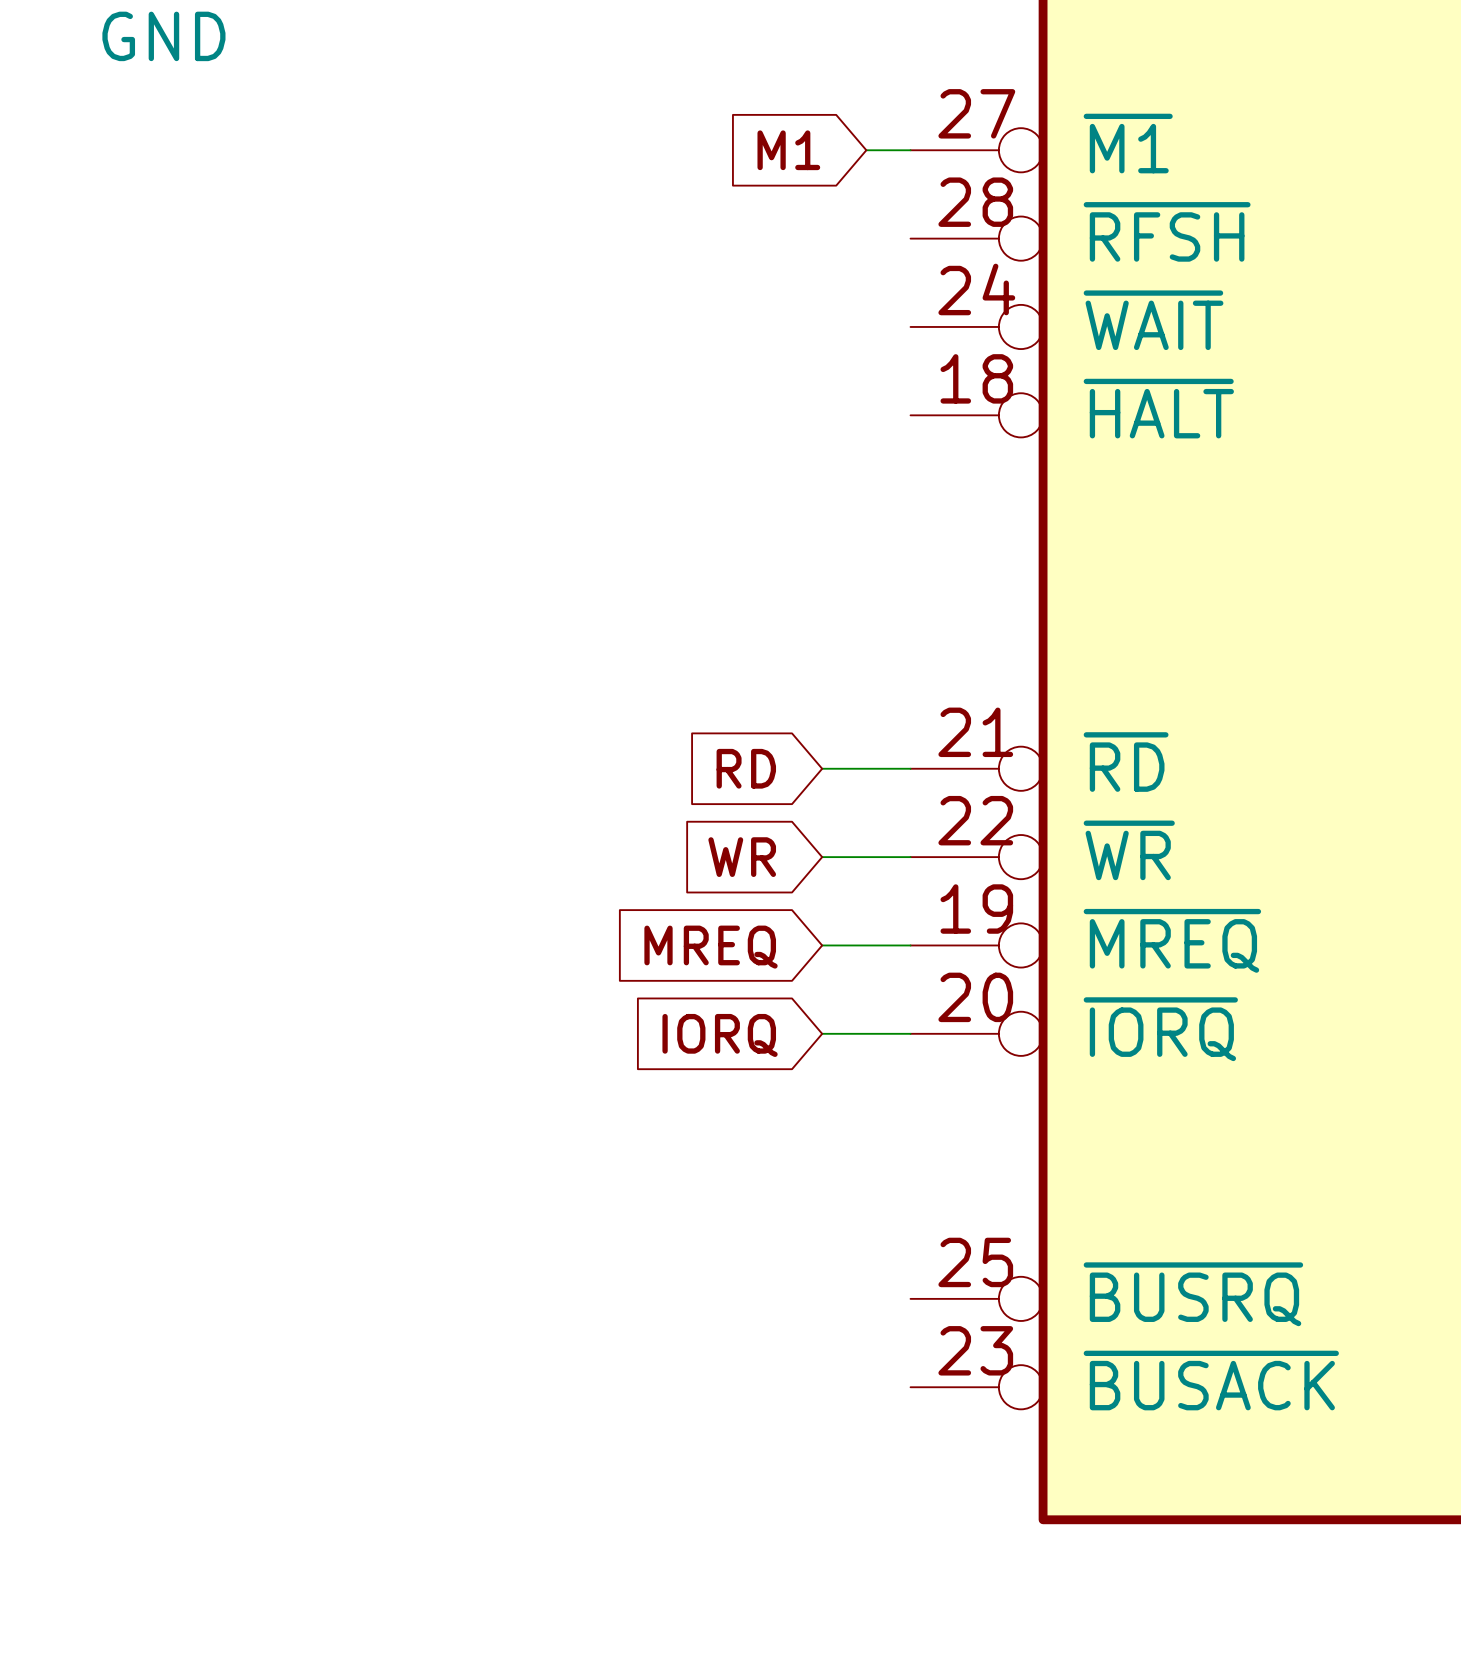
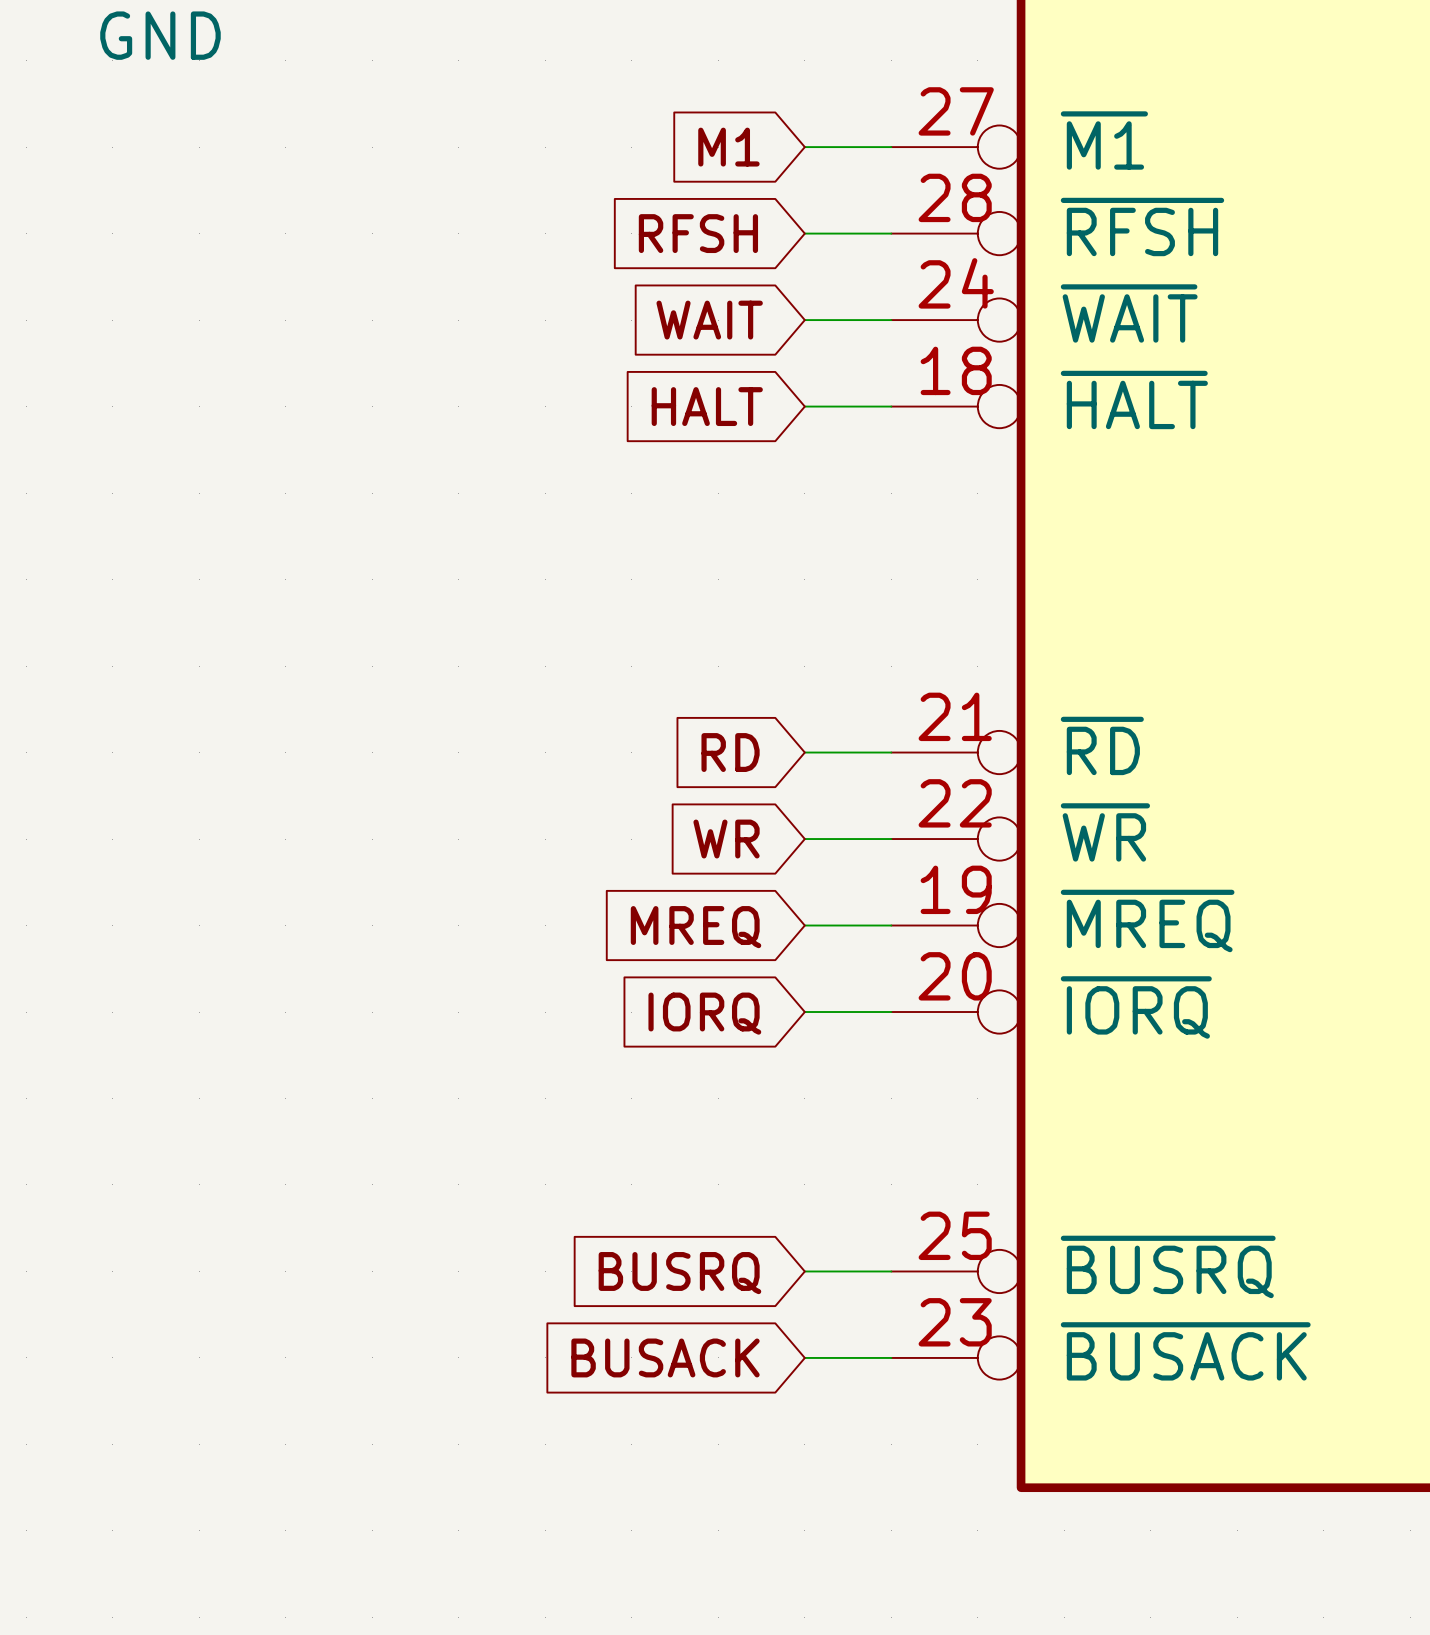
global label position: M1 (788, 150) -> M1 (728, 147)
wire: none -> (804, 147) (848, 147)
global label: none -> RFSH (698, 233)
wire: none -> (804, 233) (891, 233)
global label: none -> WAIT (709, 320)
wire: none -> (804, 320) (891, 320)
global label: none -> HALT (707, 406)
wire: none -> (804, 406) (891, 406)
wire: none -> (804, 1271) (891, 1271)
global label: none -> BUSRQ (679, 1273)
global label: none -> BUSACK (665, 1357)
wire: none -> (804, 1357) (891, 1357)

